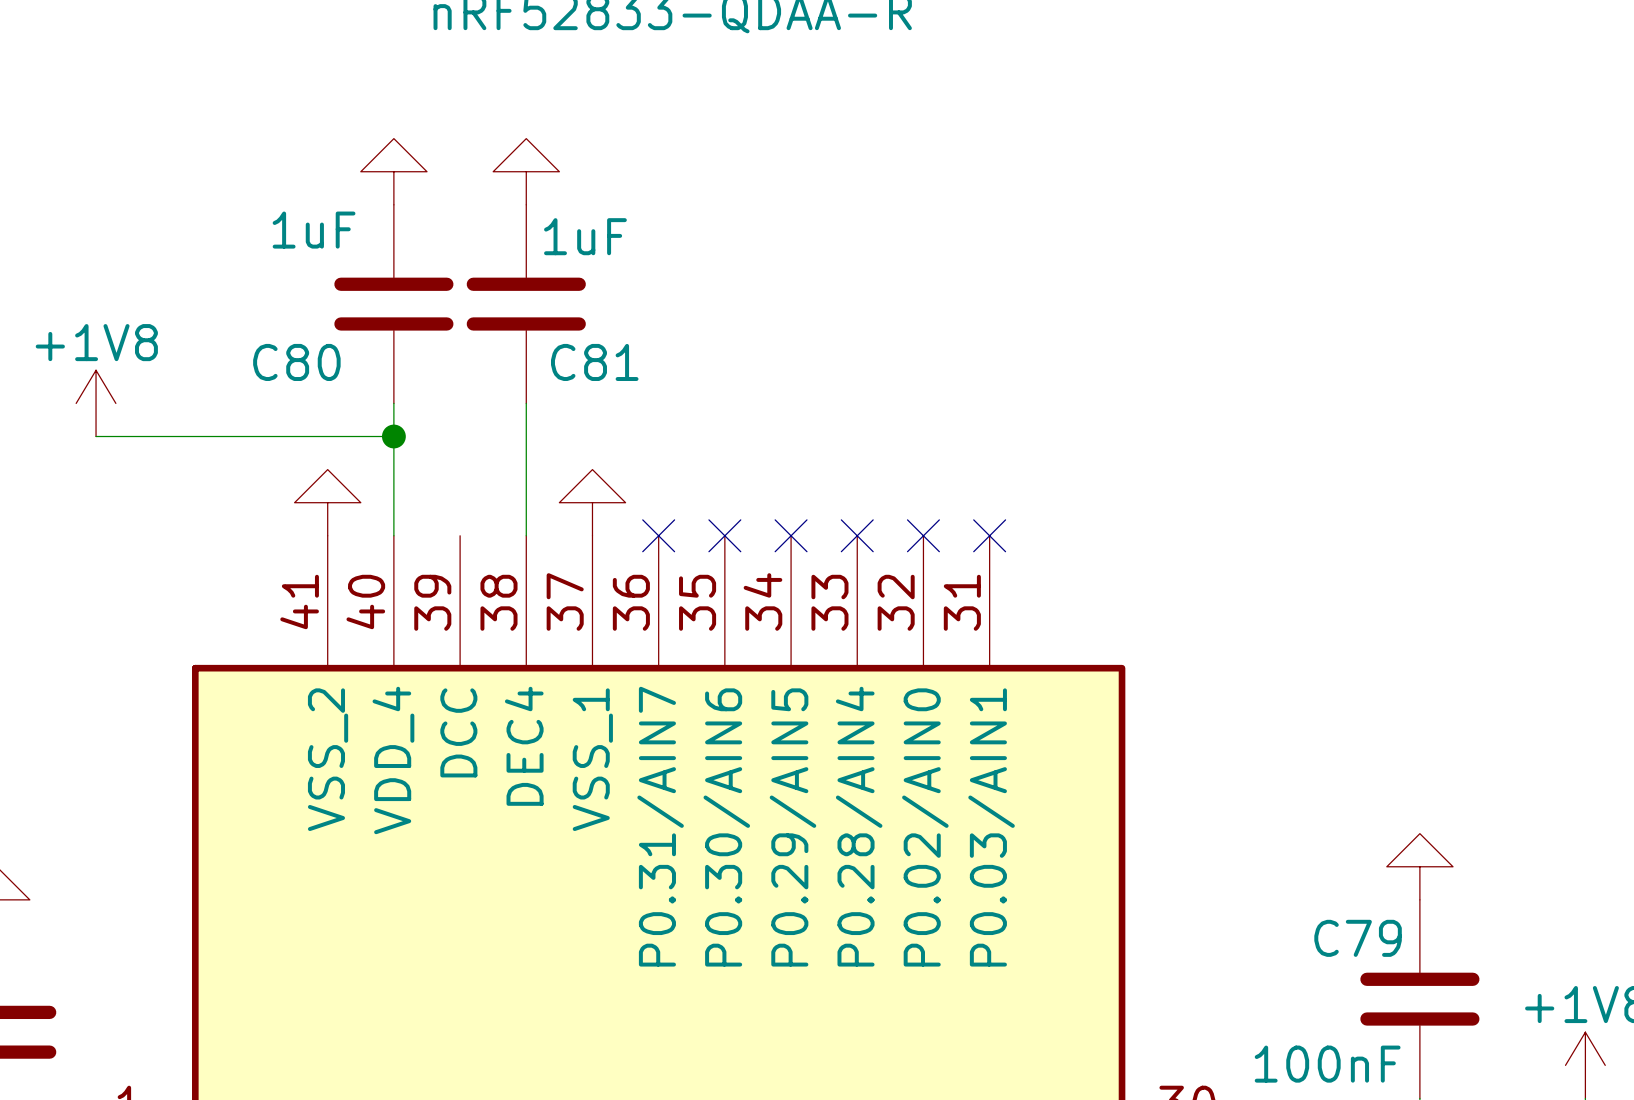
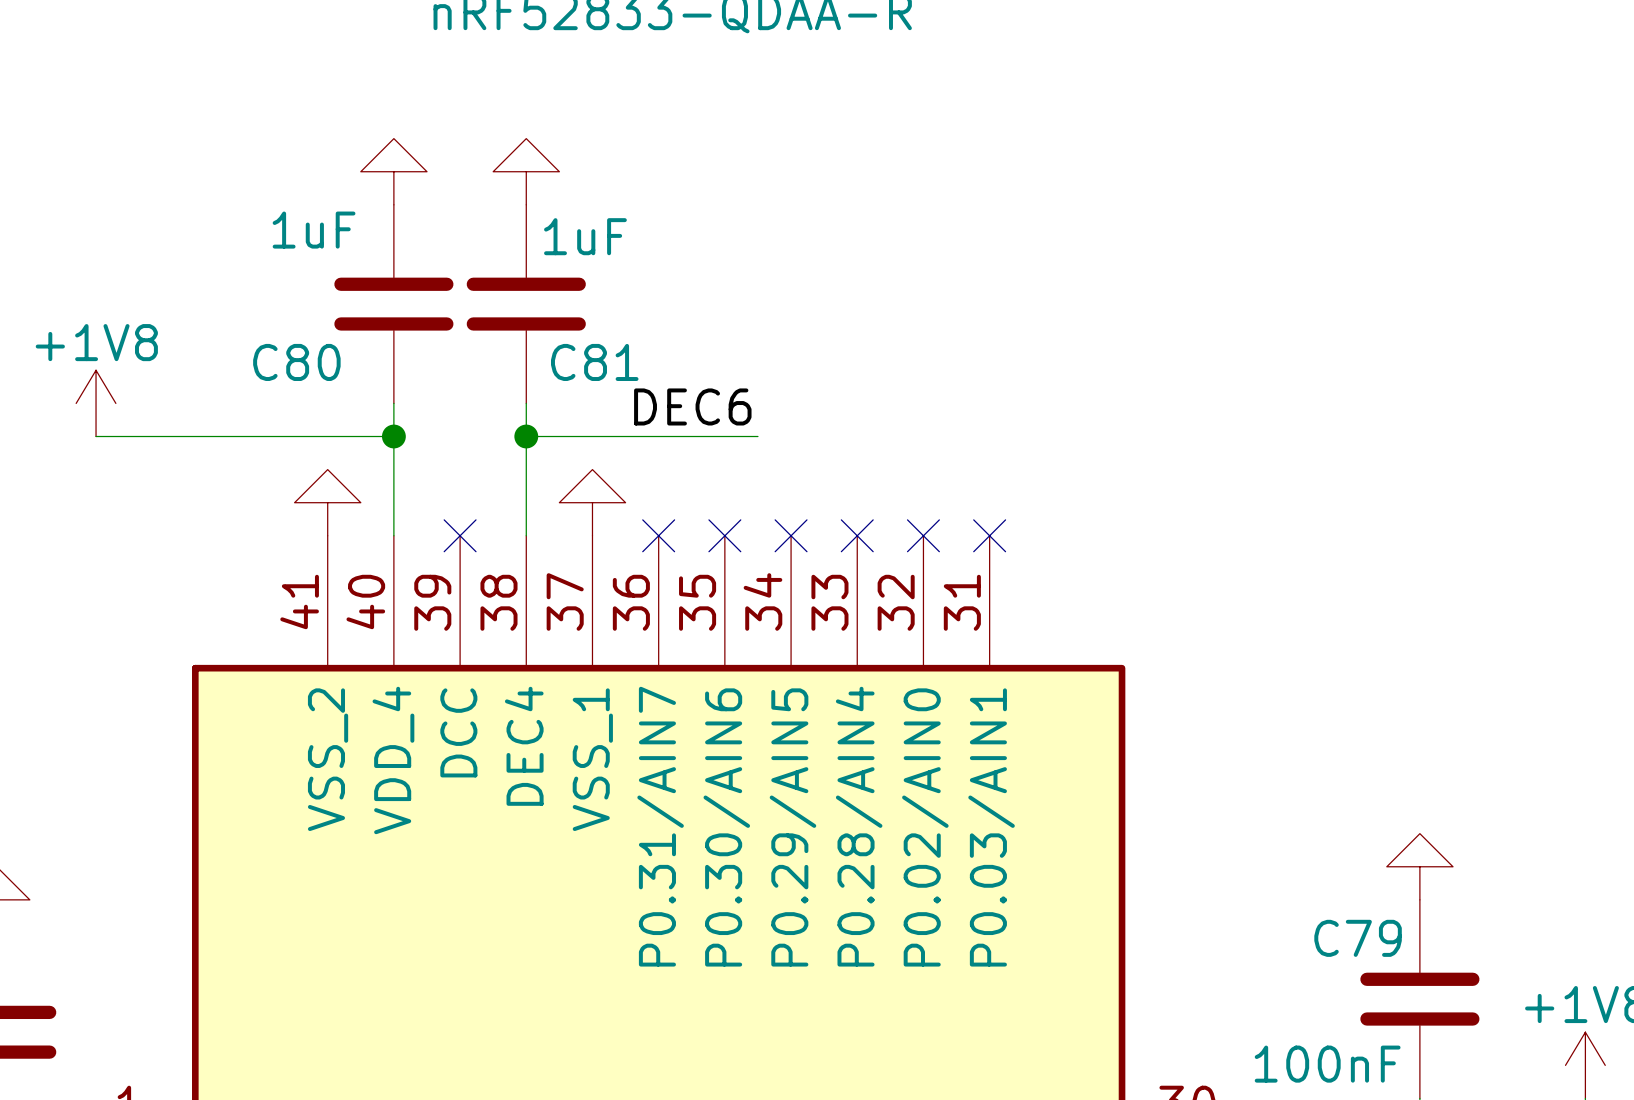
label: none -> DEC6 (692, 406)
wire: none -> (526, 436) (757, 436)
junction: none -> (526, 436)
no-connect mark: none -> (460, 535)

